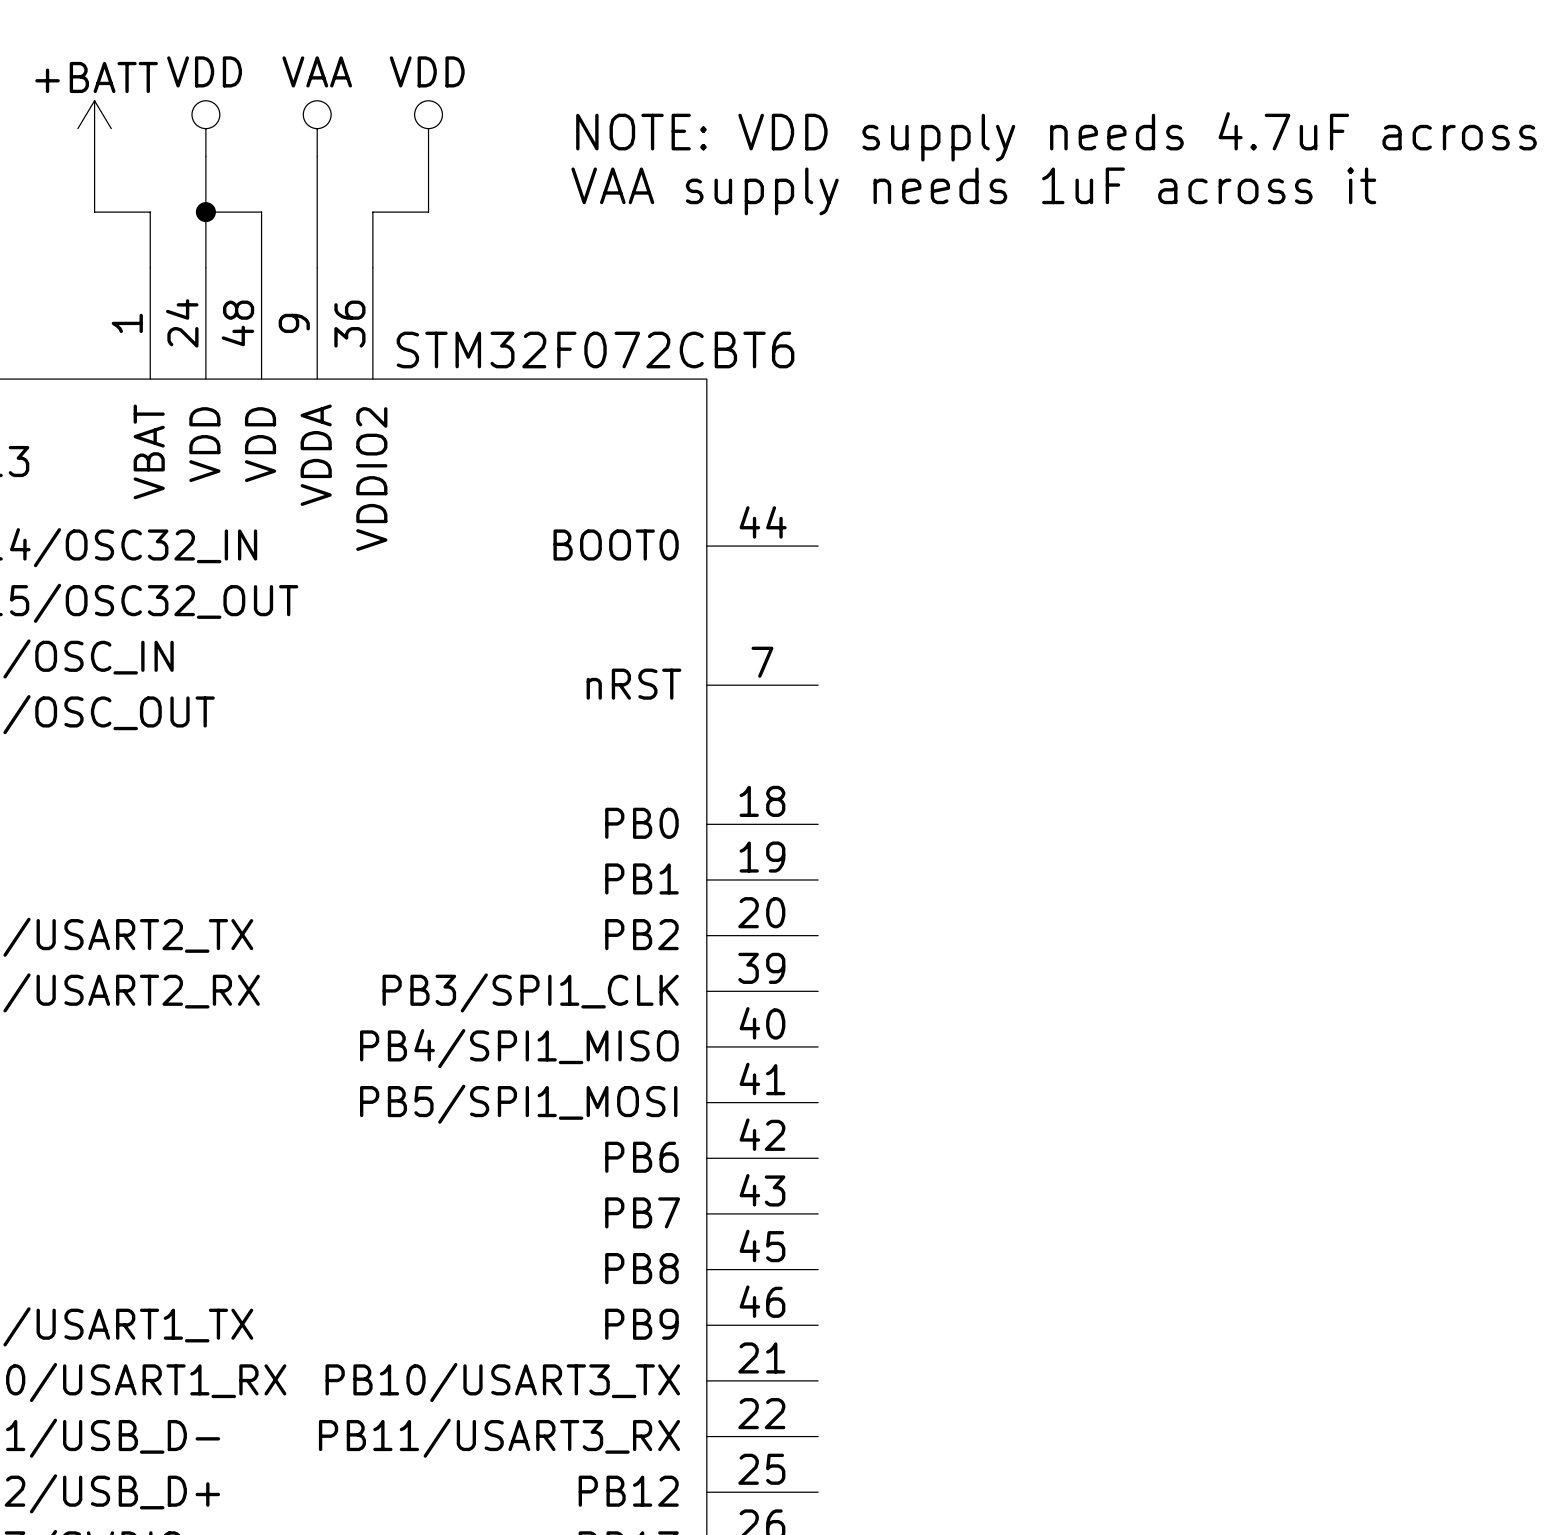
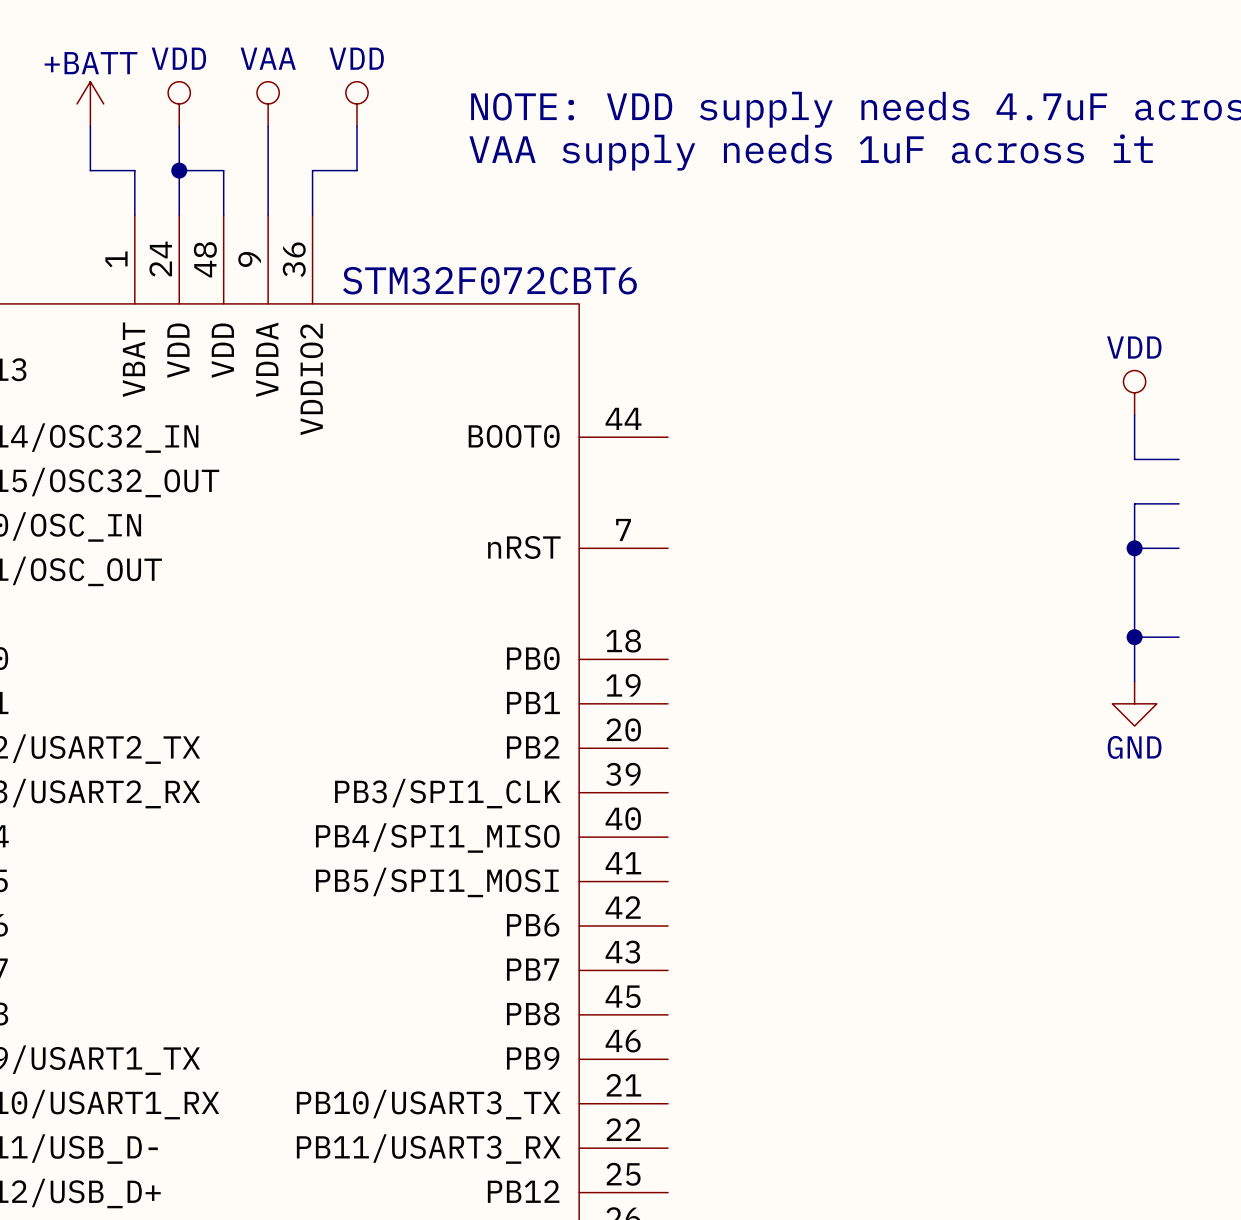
power symbol: none -> VDD (1134, 392)
wire: none -> (1134, 415) (1134, 459) (1179, 459)
wire: none -> (1179, 503) (1134, 503) (1134, 681)
wire: none -> (1134, 548) (1179, 548)
junction: none -> (1134, 548)
wire: none -> (1134, 637) (1179, 637)
junction: none -> (1134, 637)
power symbol: none -> GND (1134, 703)

